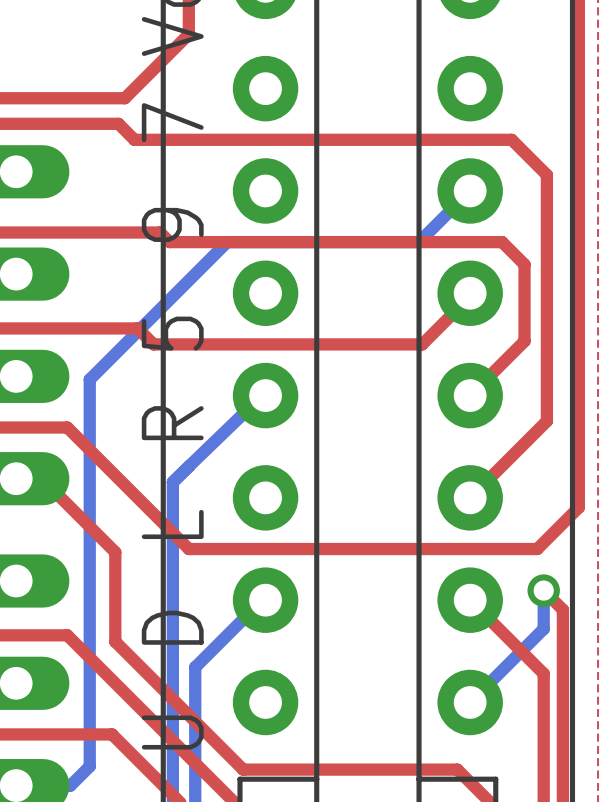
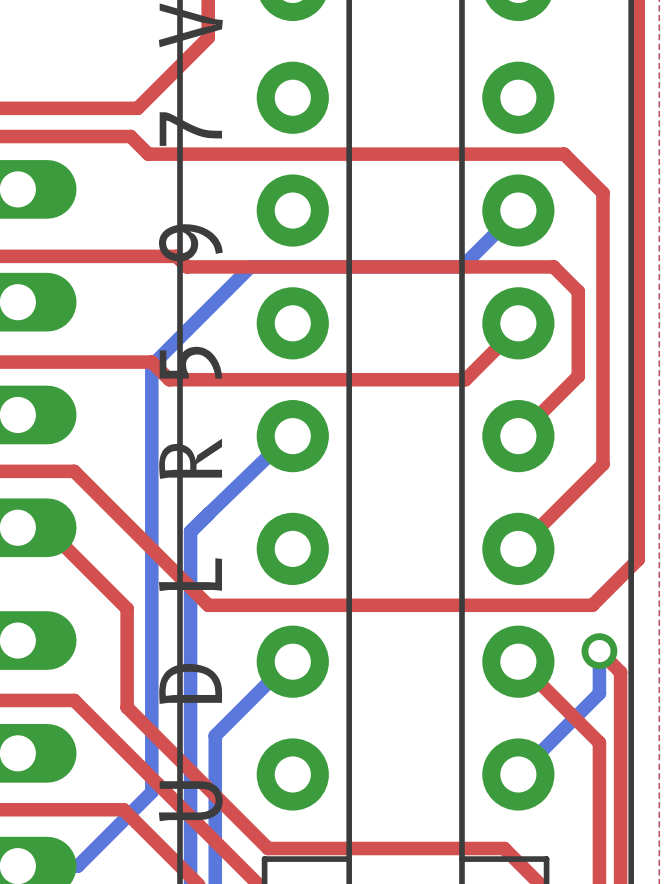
bottom track: (137, 331) (89, 379) (89, 766) -> (151, 365) (151, 792) (98, 844)

